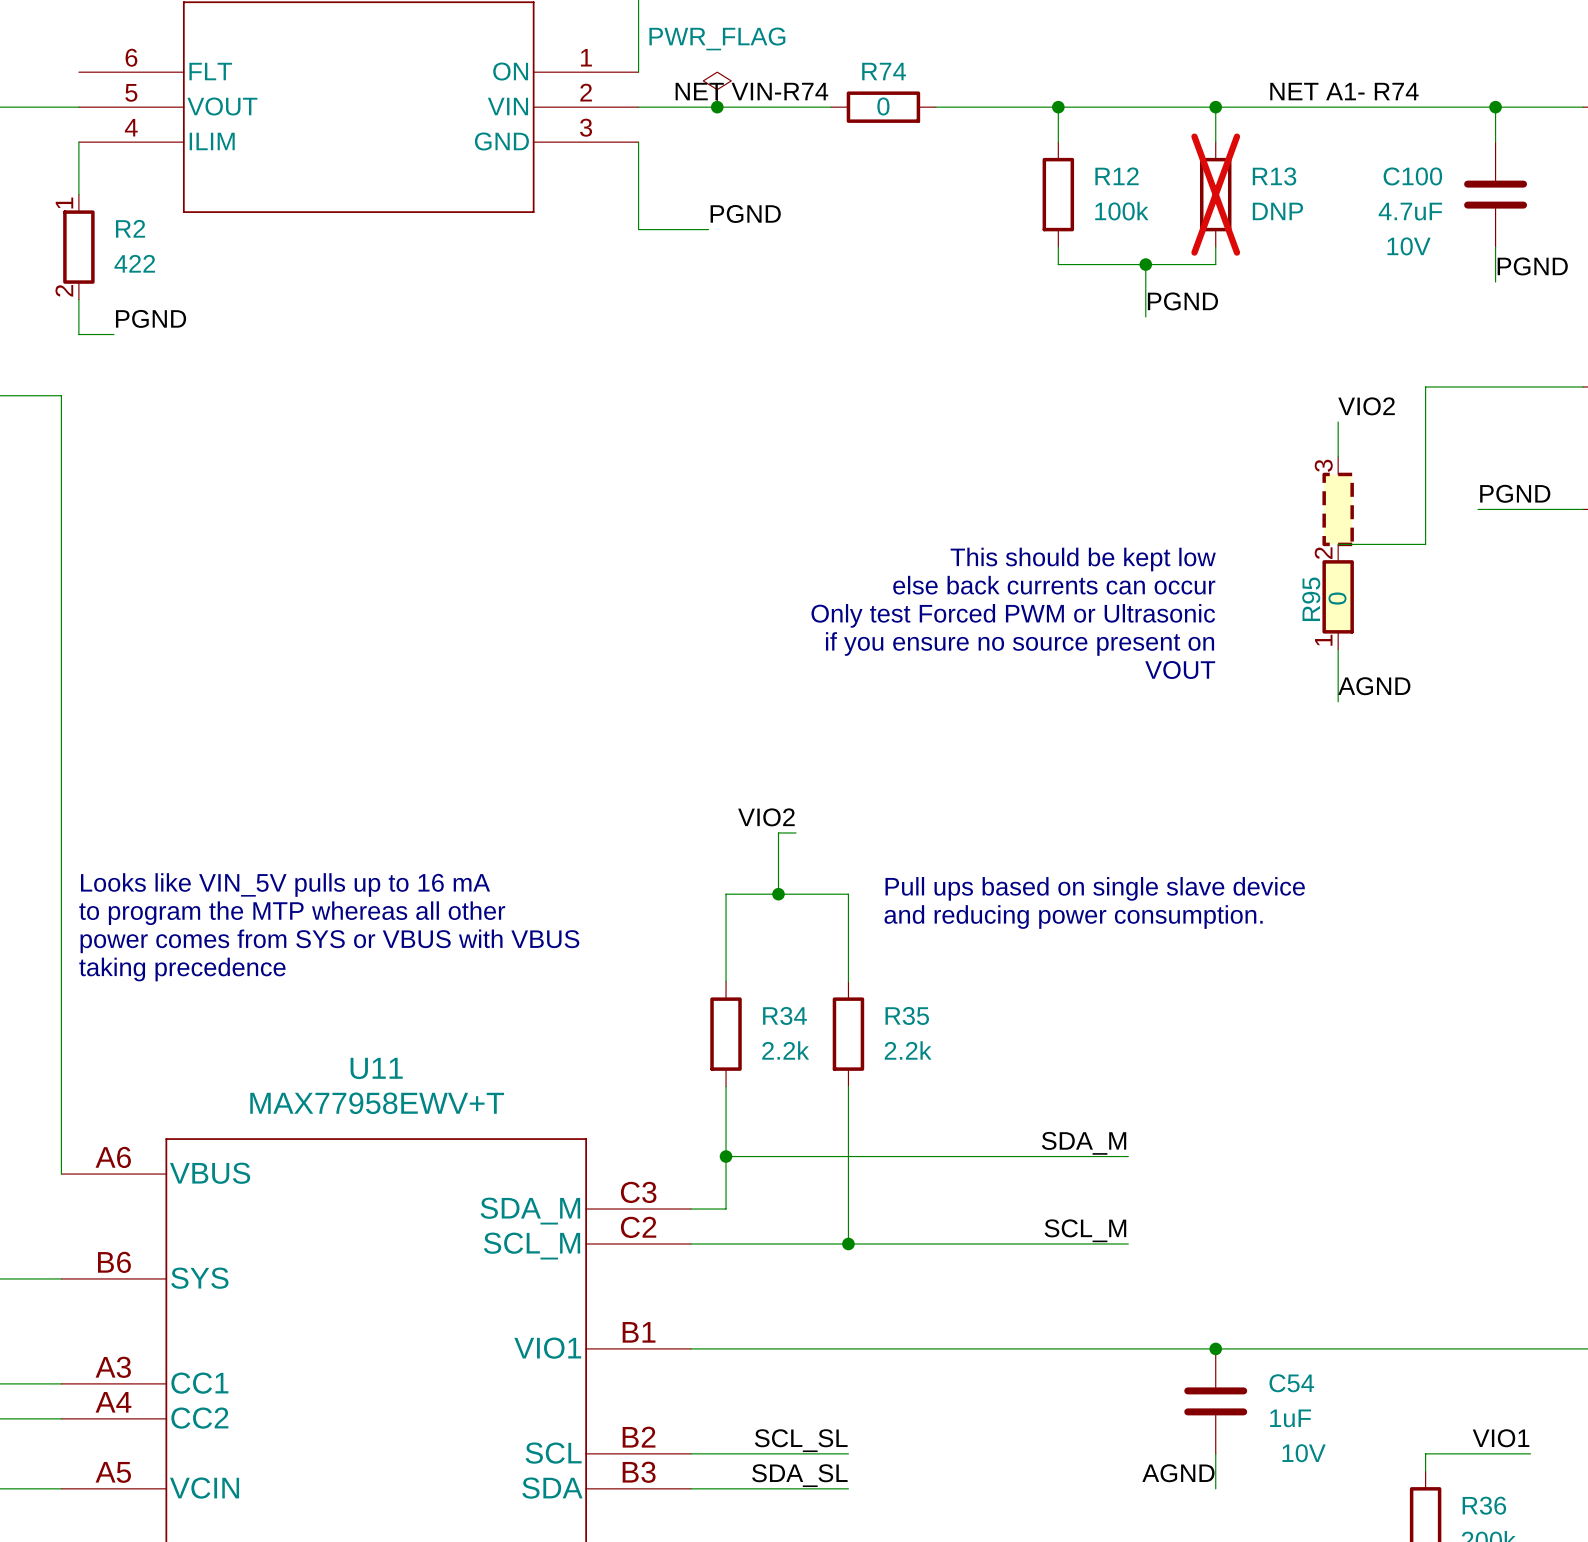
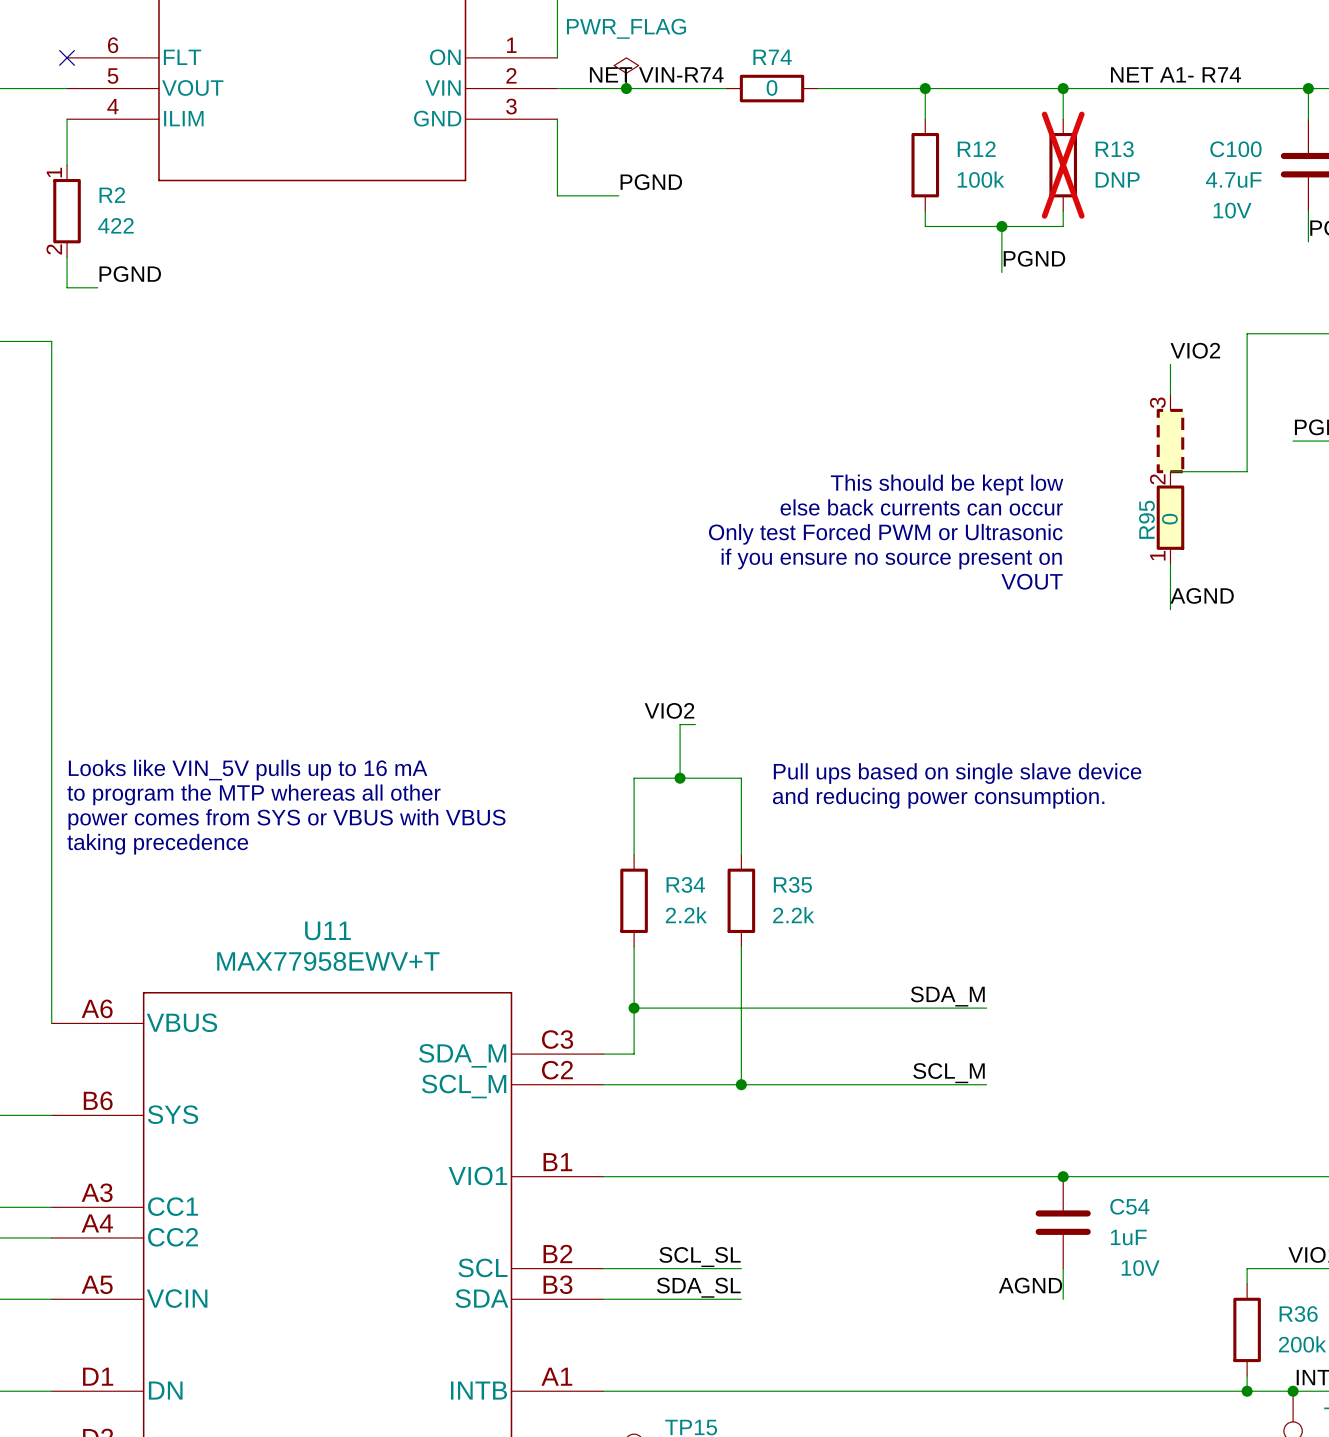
no-connect mark: none -> (67, 57)

